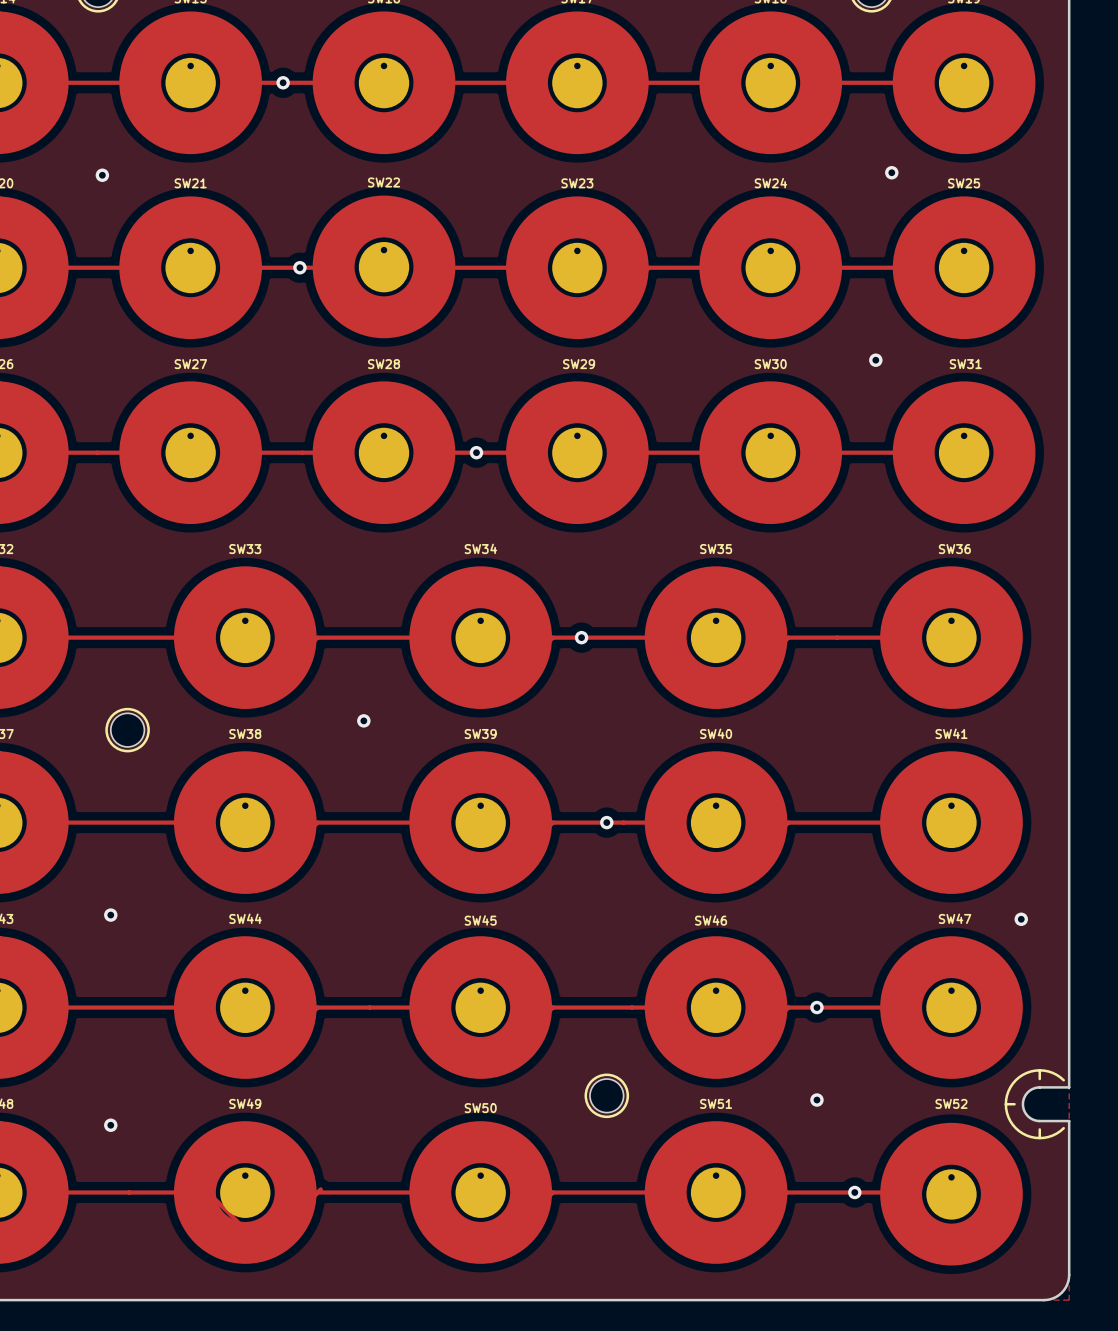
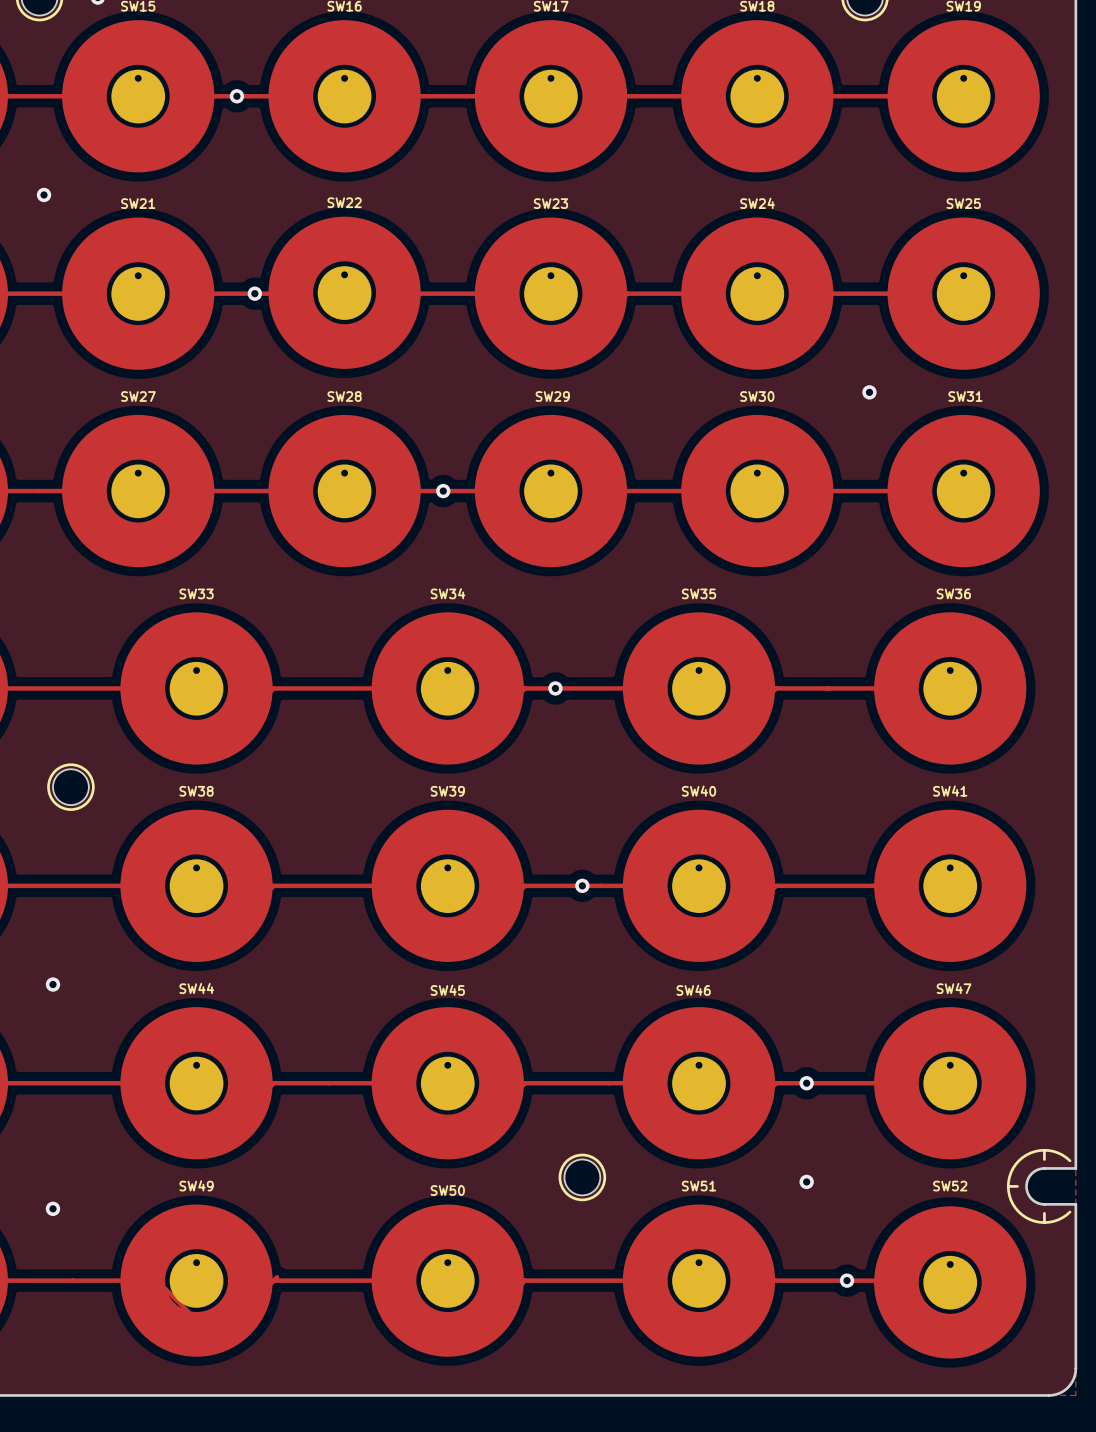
via: (891, 172) -> none
via: (363, 720) -> none
via: (1021, 919) -> none

